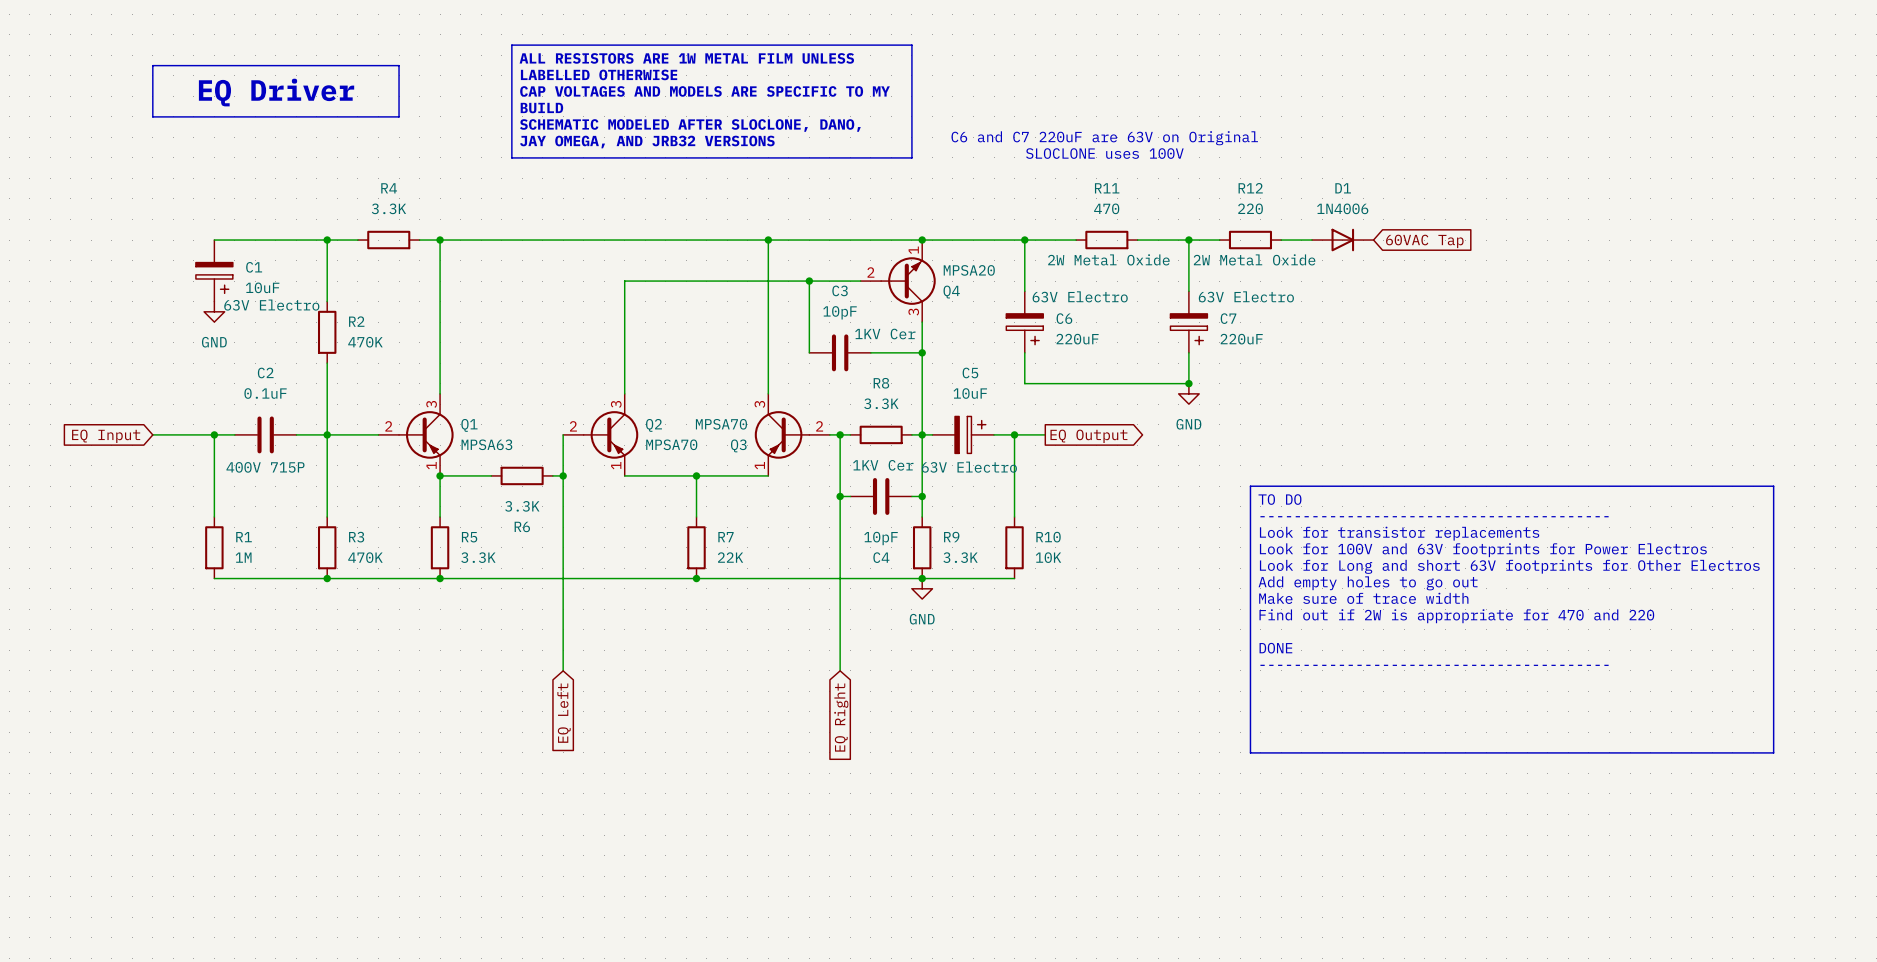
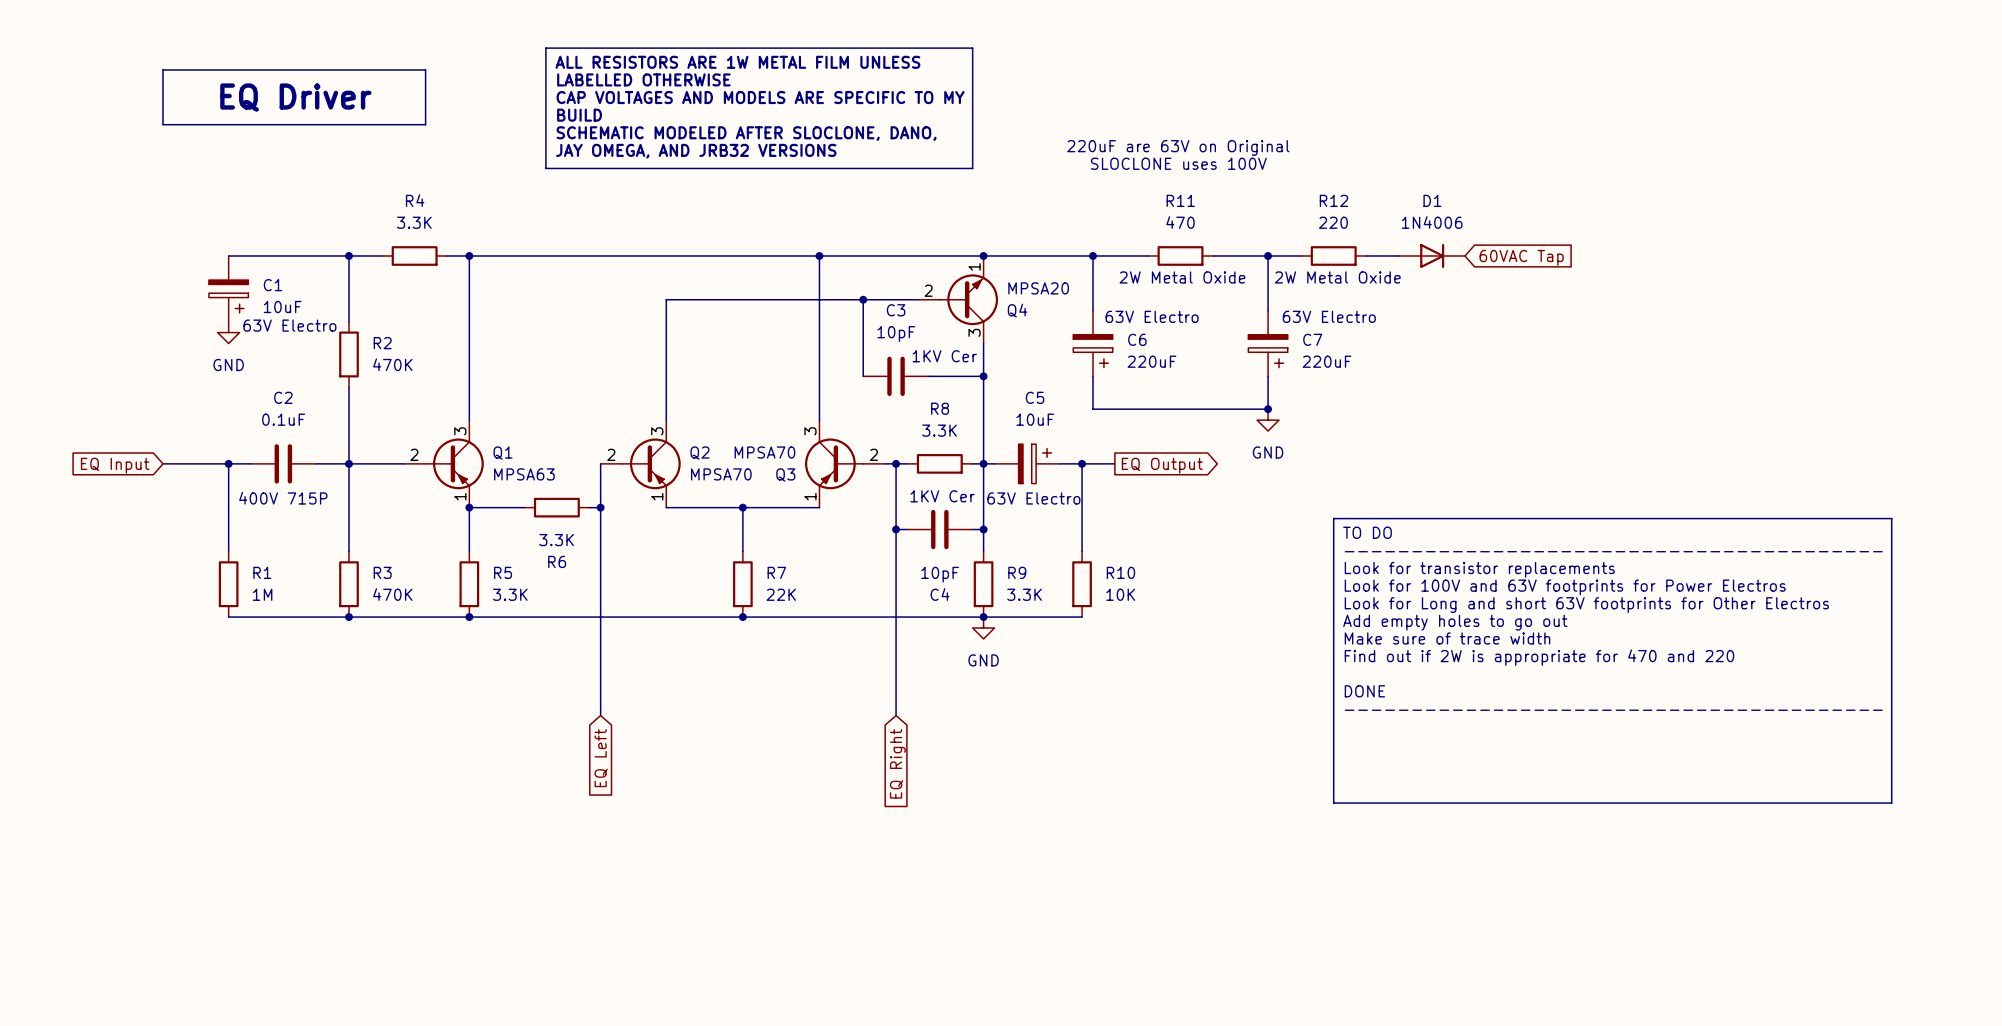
text: C6 and C7 220uF are 63V on Original (1104, 138) -> 220uF are 63V on Original (1178, 147)

